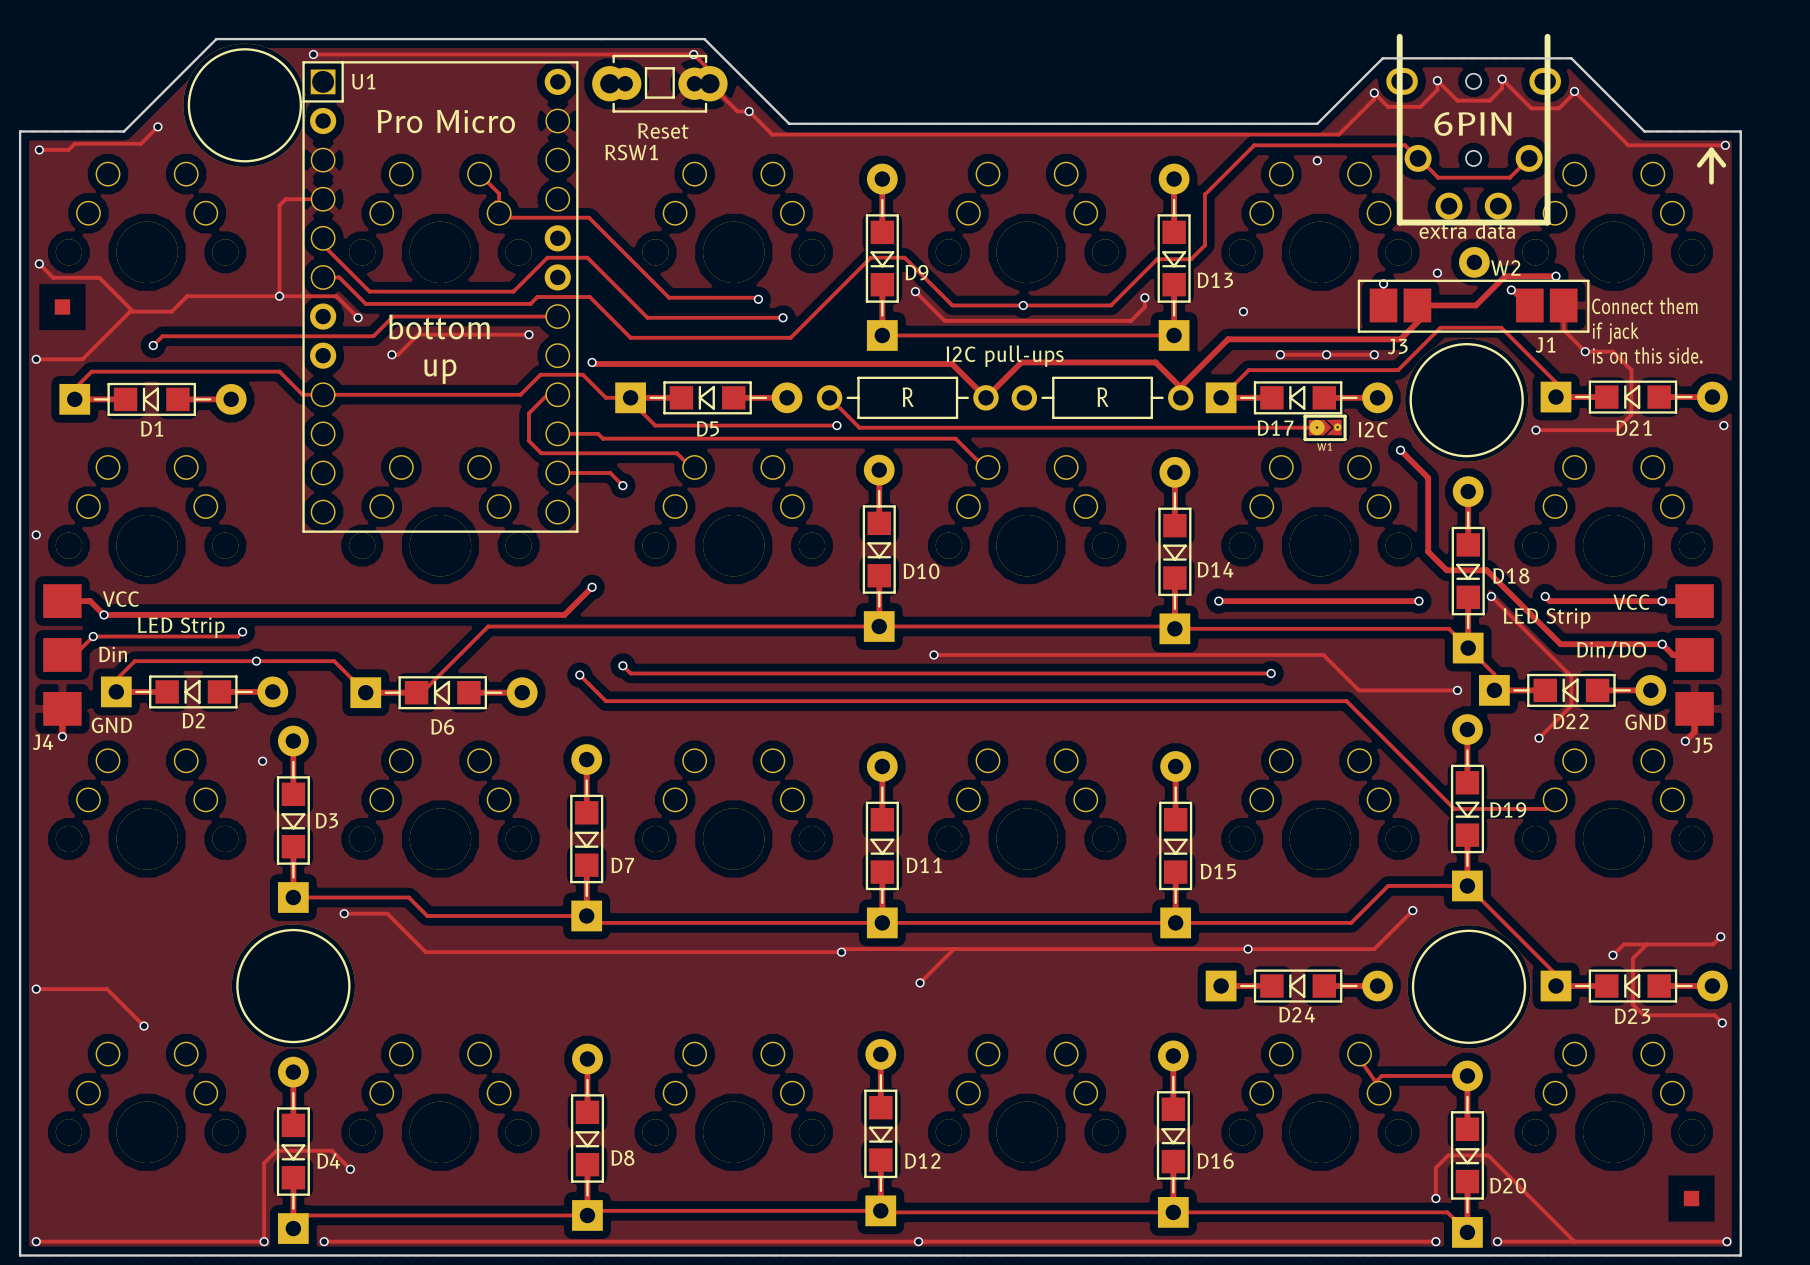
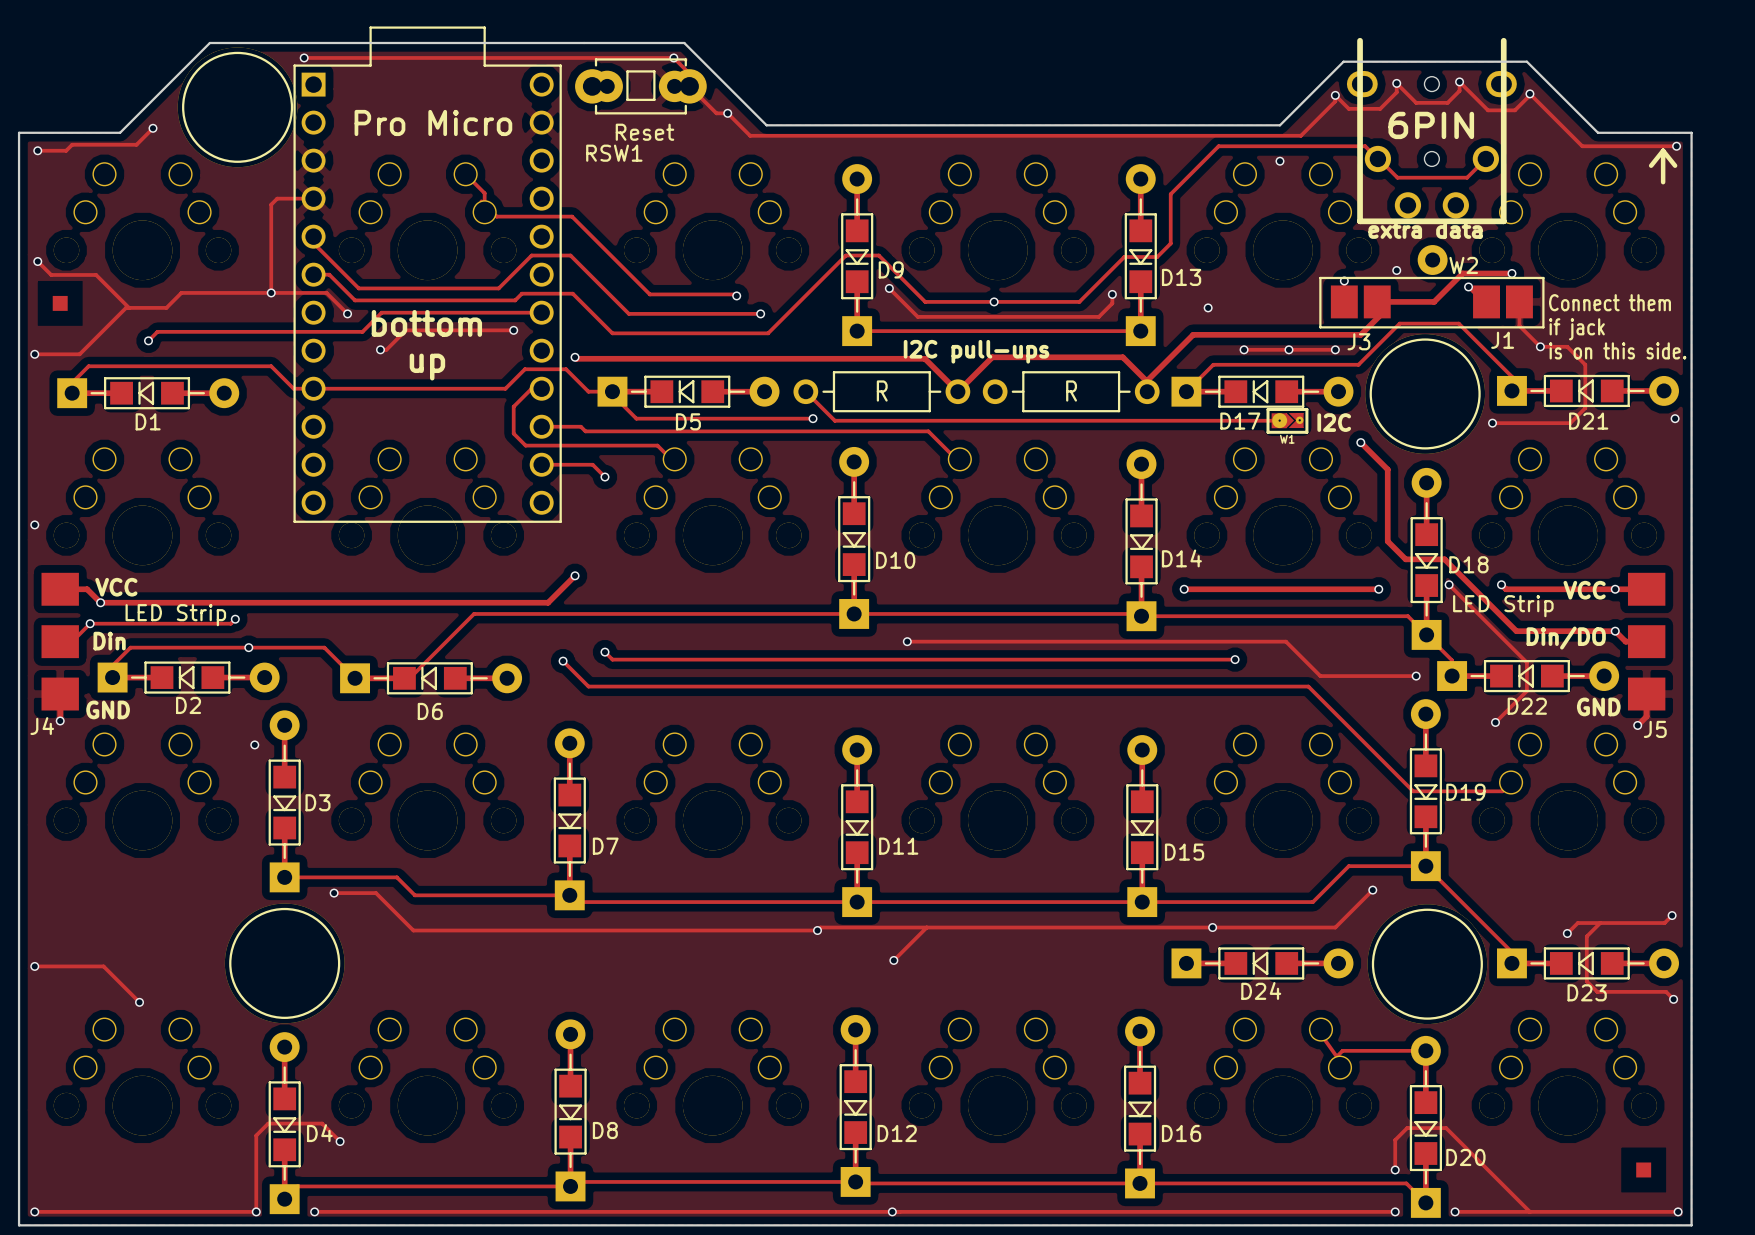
part: none -> (427, 274)
U1: (440, 297) -> none

